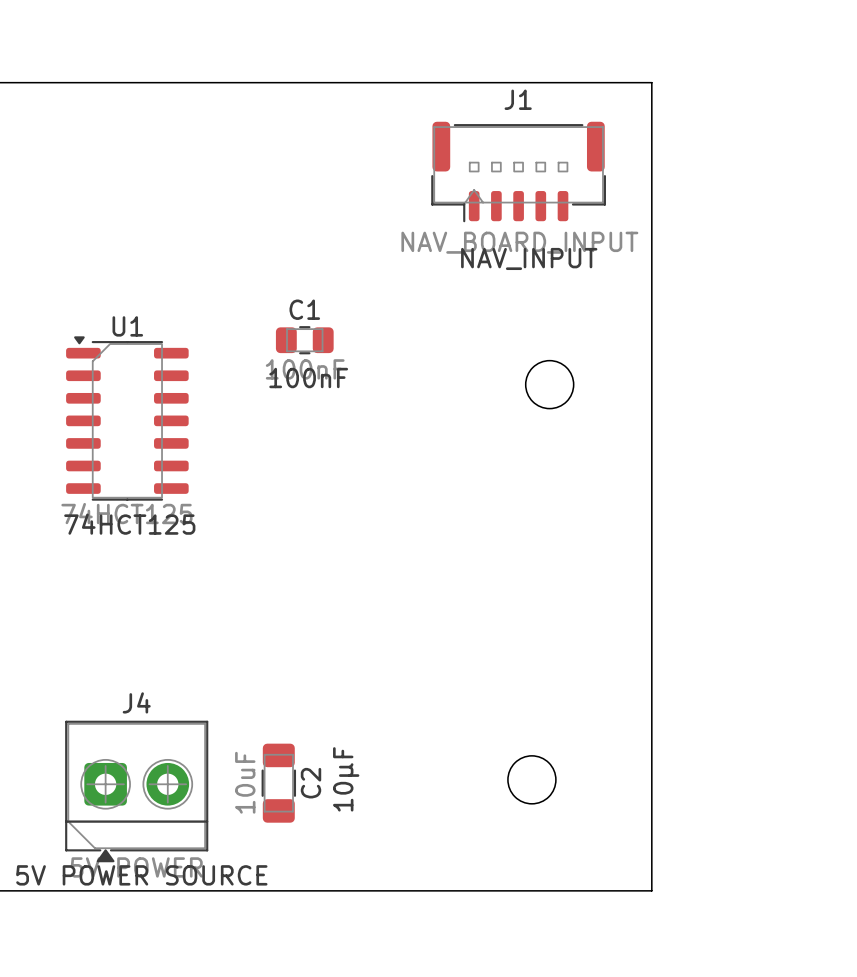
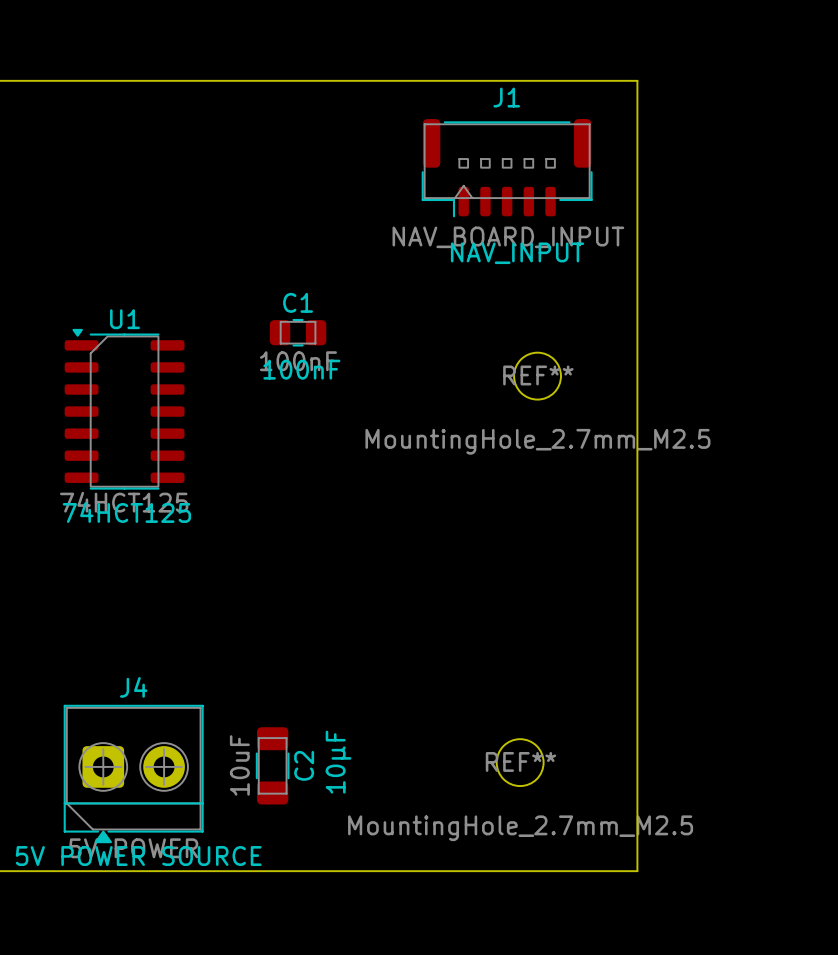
REF** name: none -> REF** (538, 375)
REF** value: none -> MountingHole_2.7mm_M2.5 (537, 441)
REF** name: none -> REF** (520, 761)
REF** value: none -> MountingHole_2.7mm_M2.5 (520, 828)

